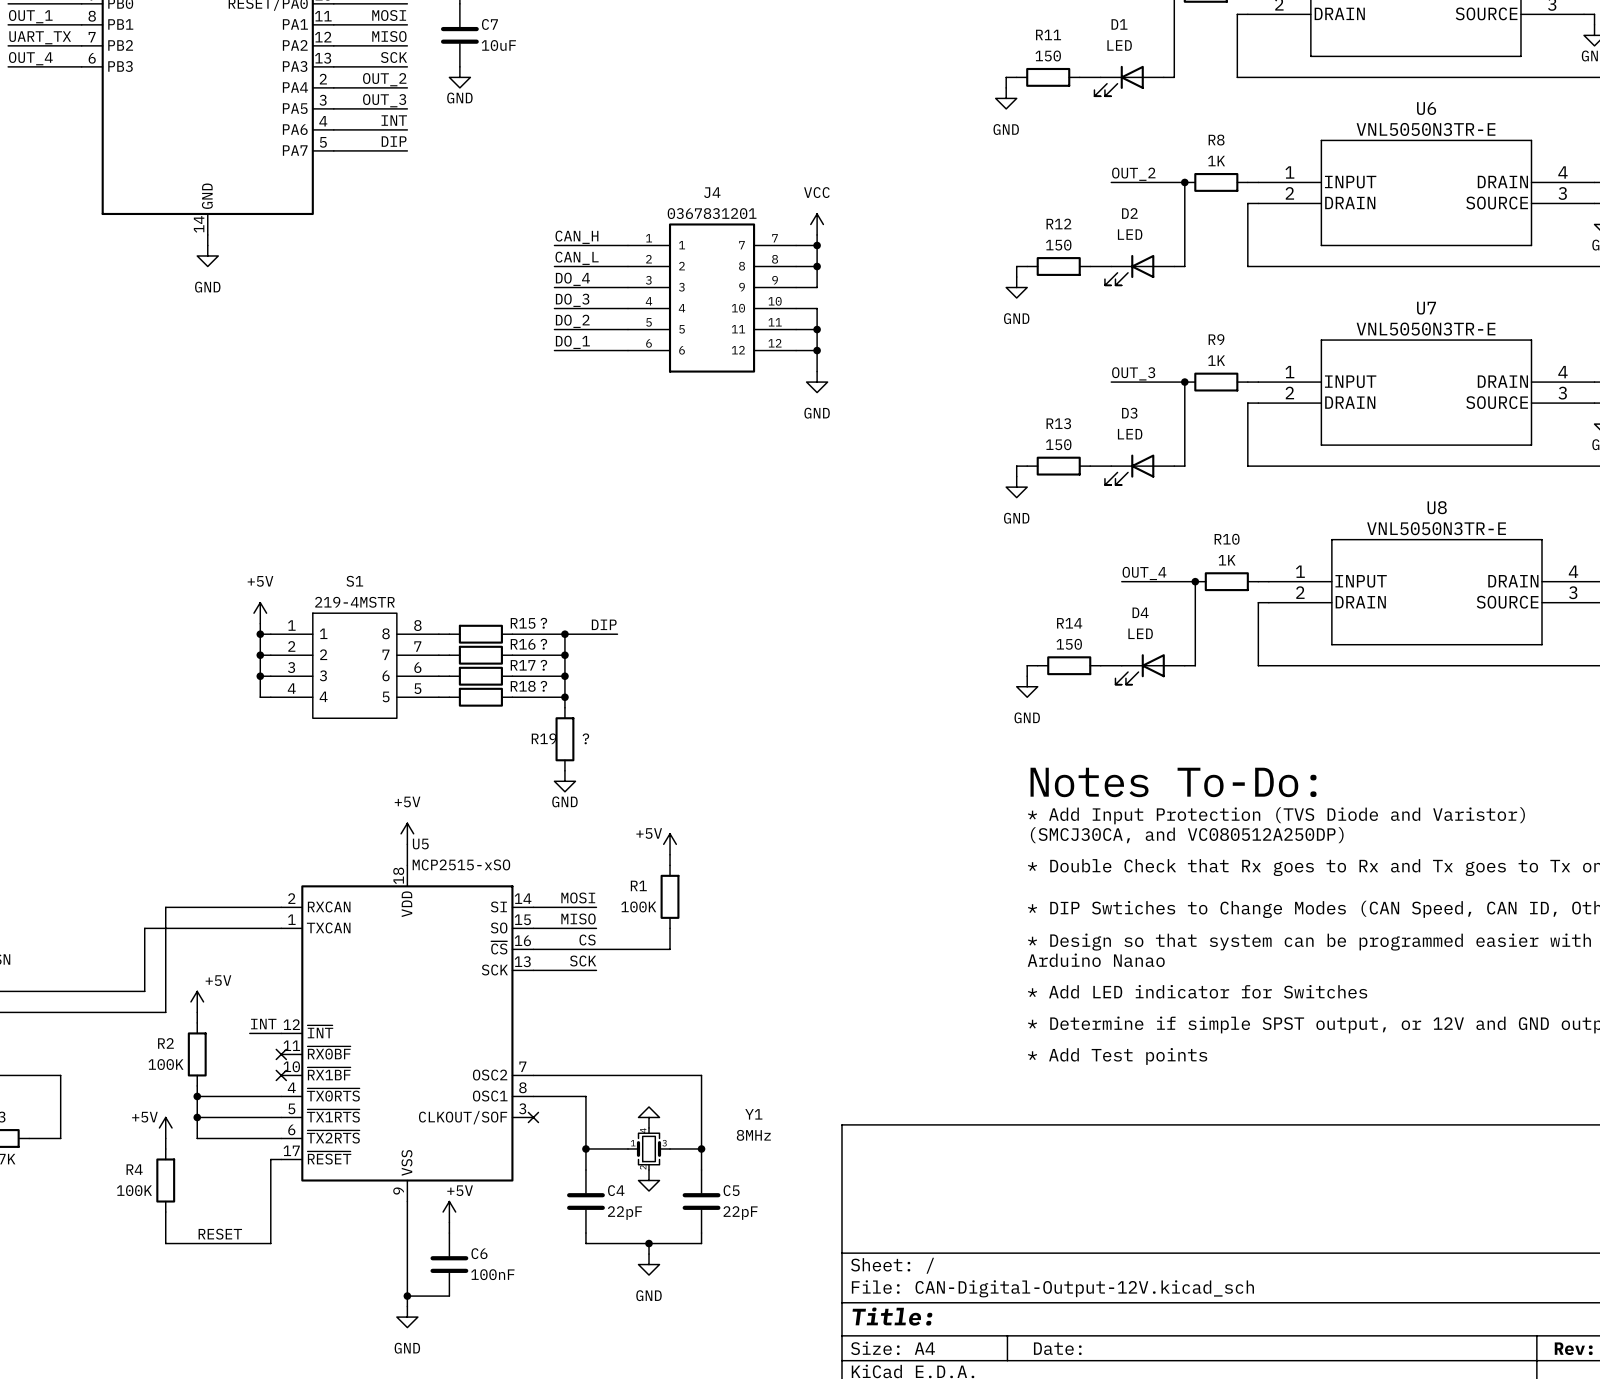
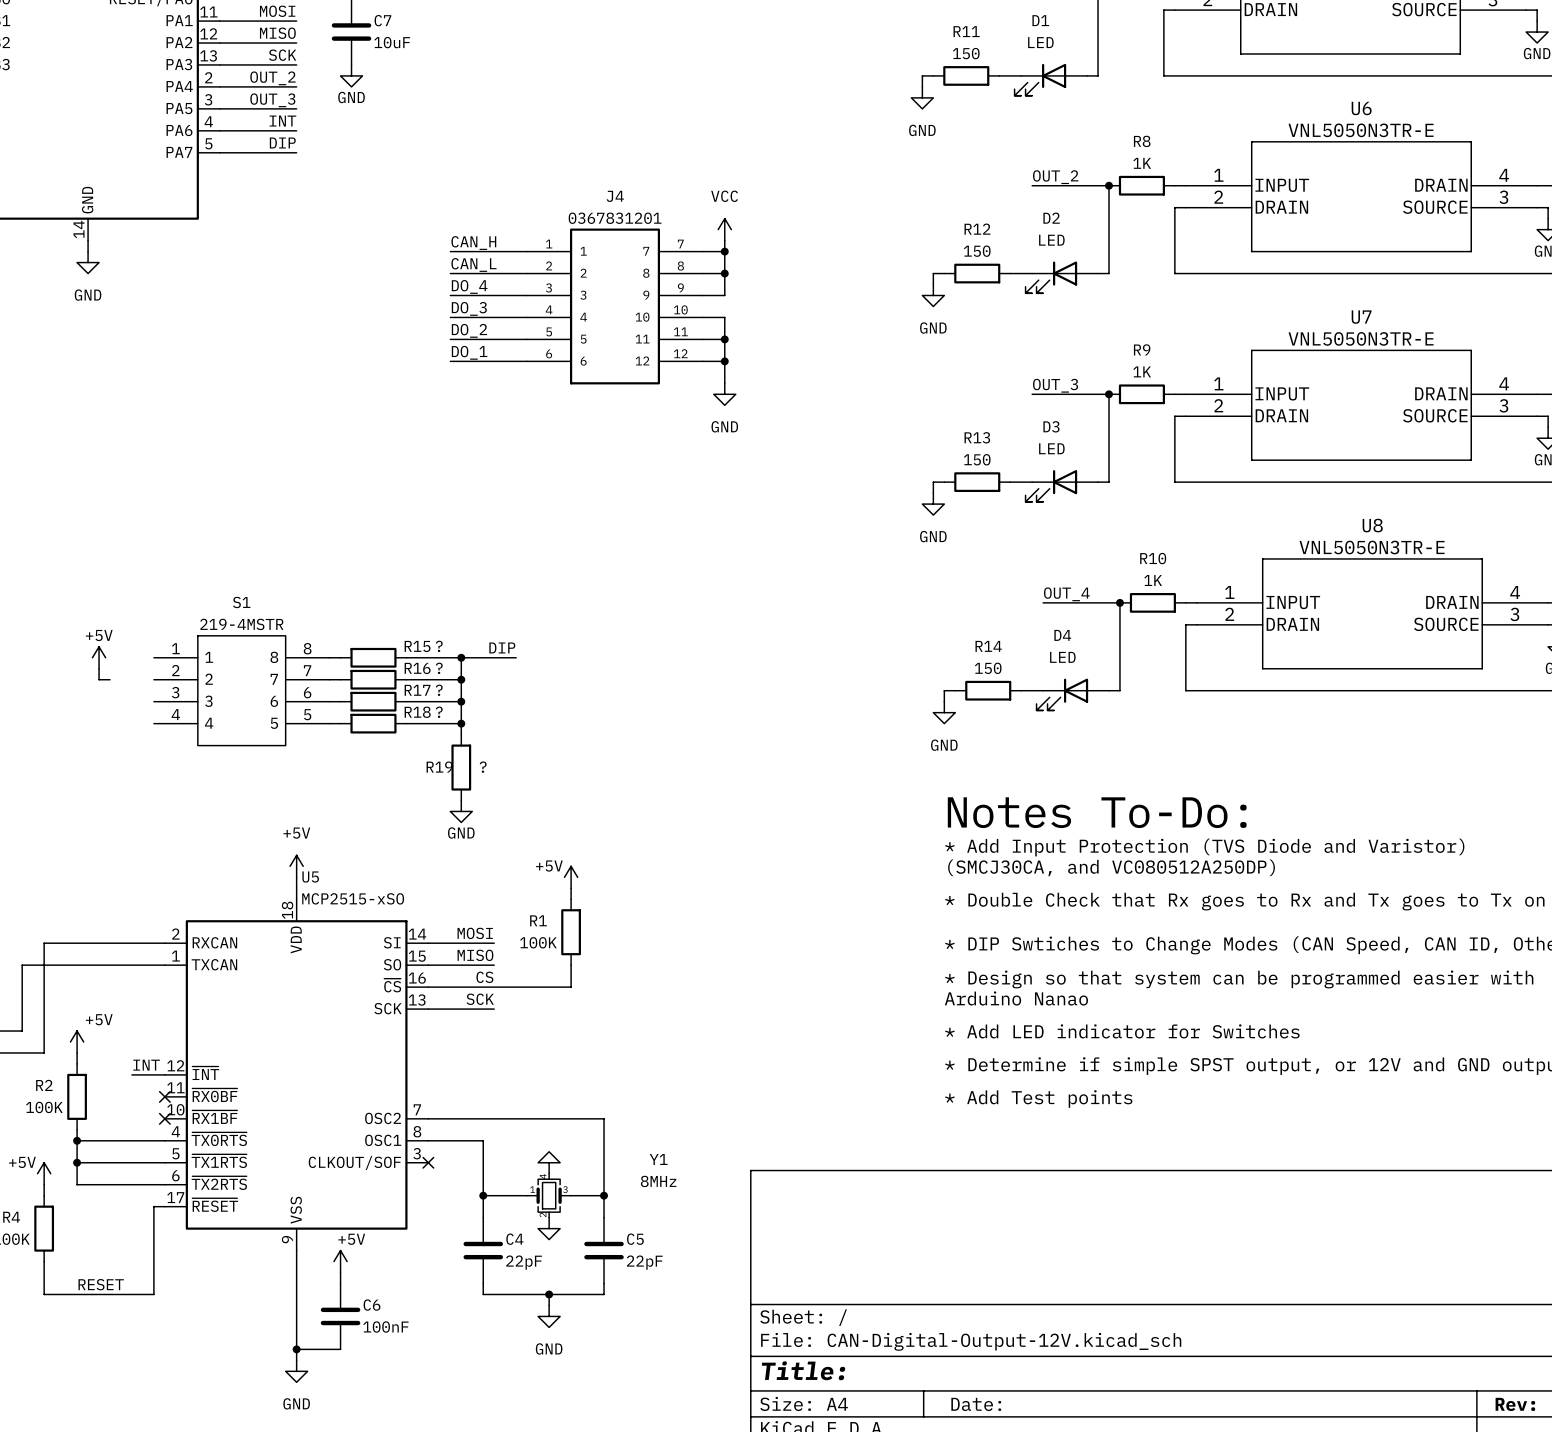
power symbol text position: +5V (260, 581) -> +5V (99, 635)
power symbol position: +5V (260, 613) -> +5V (99, 657)
wire: (260, 623) (260, 697) (270, 697) -> none
wire: (260, 634) (270, 634) -> none
junction: (260, 634) -> none
wire: none -> (99, 668) (99, 679) (110, 679)
wire: (260, 655) (270, 655) -> none
junction: (260, 655) -> none
wire: (260, 676) (270, 676) -> none
junction: (260, 676) -> none

